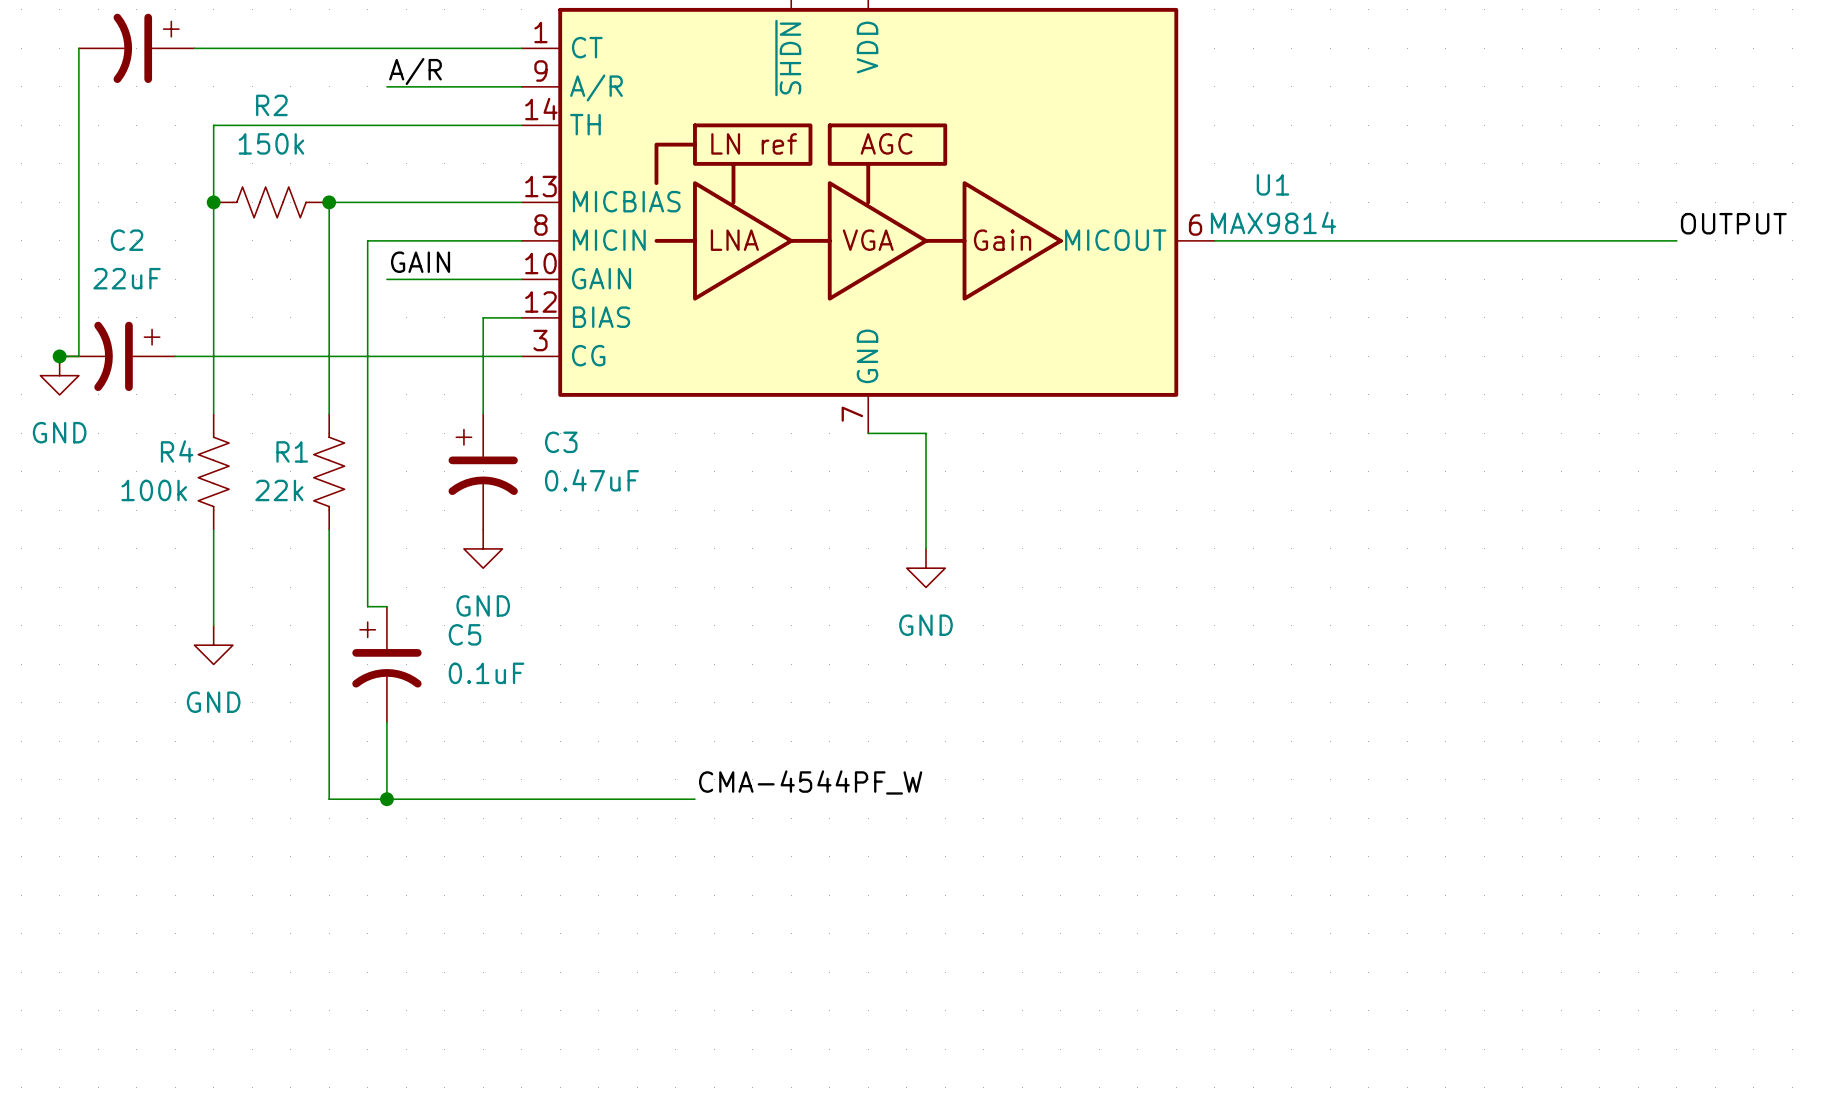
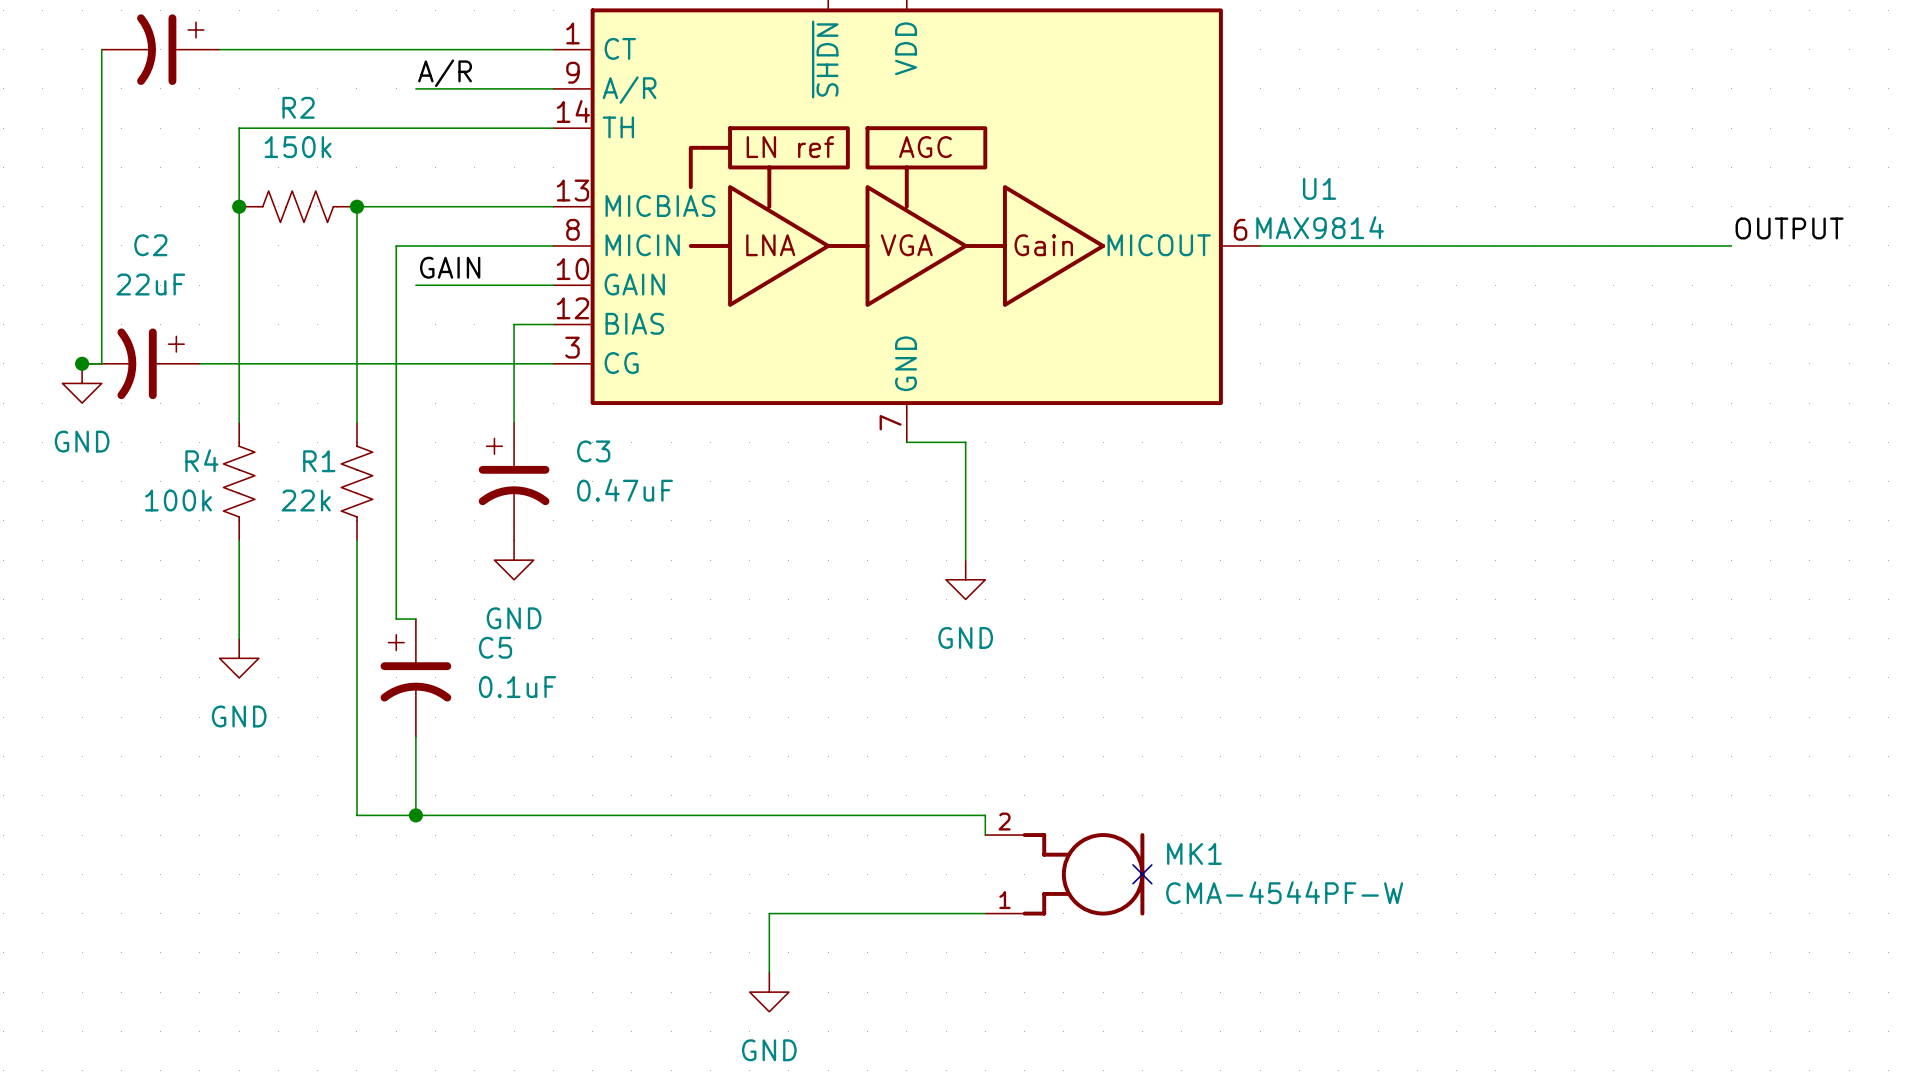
label: CMA-4544PF_W (810, 782) -> none
wire: none -> (730, 815) (985, 815) (985, 835)
MK1: none -> CMA-4544PF-W (1064, 874)
no-connect mark: none -> (1142, 874)
wire: none -> (985, 913) (769, 913) (769, 972)
power symbol: none -> GND (769, 992)

